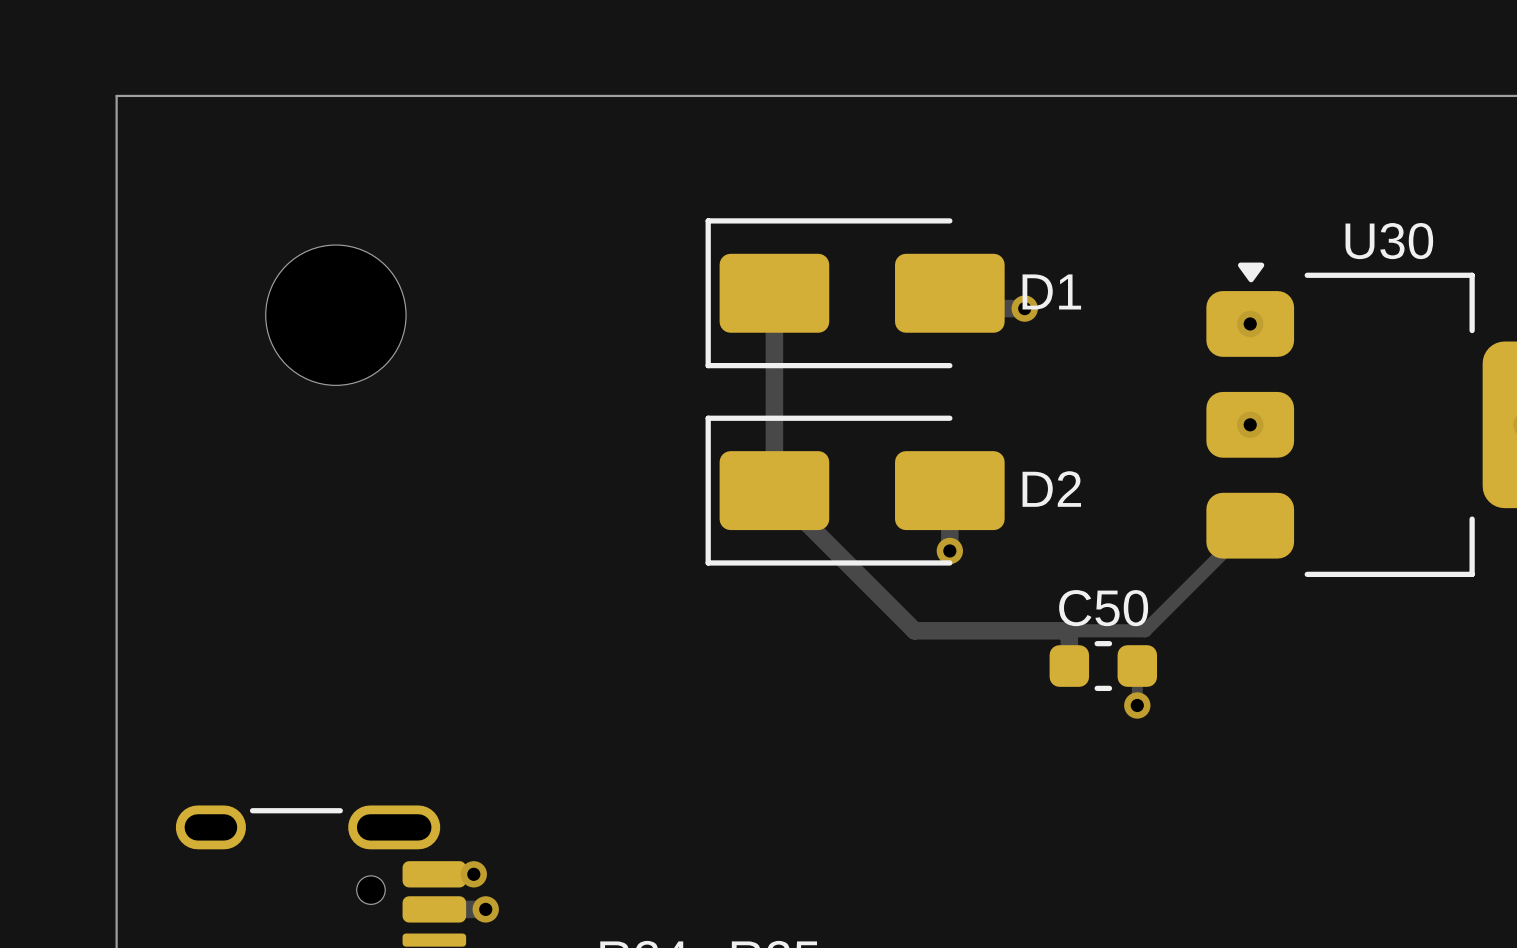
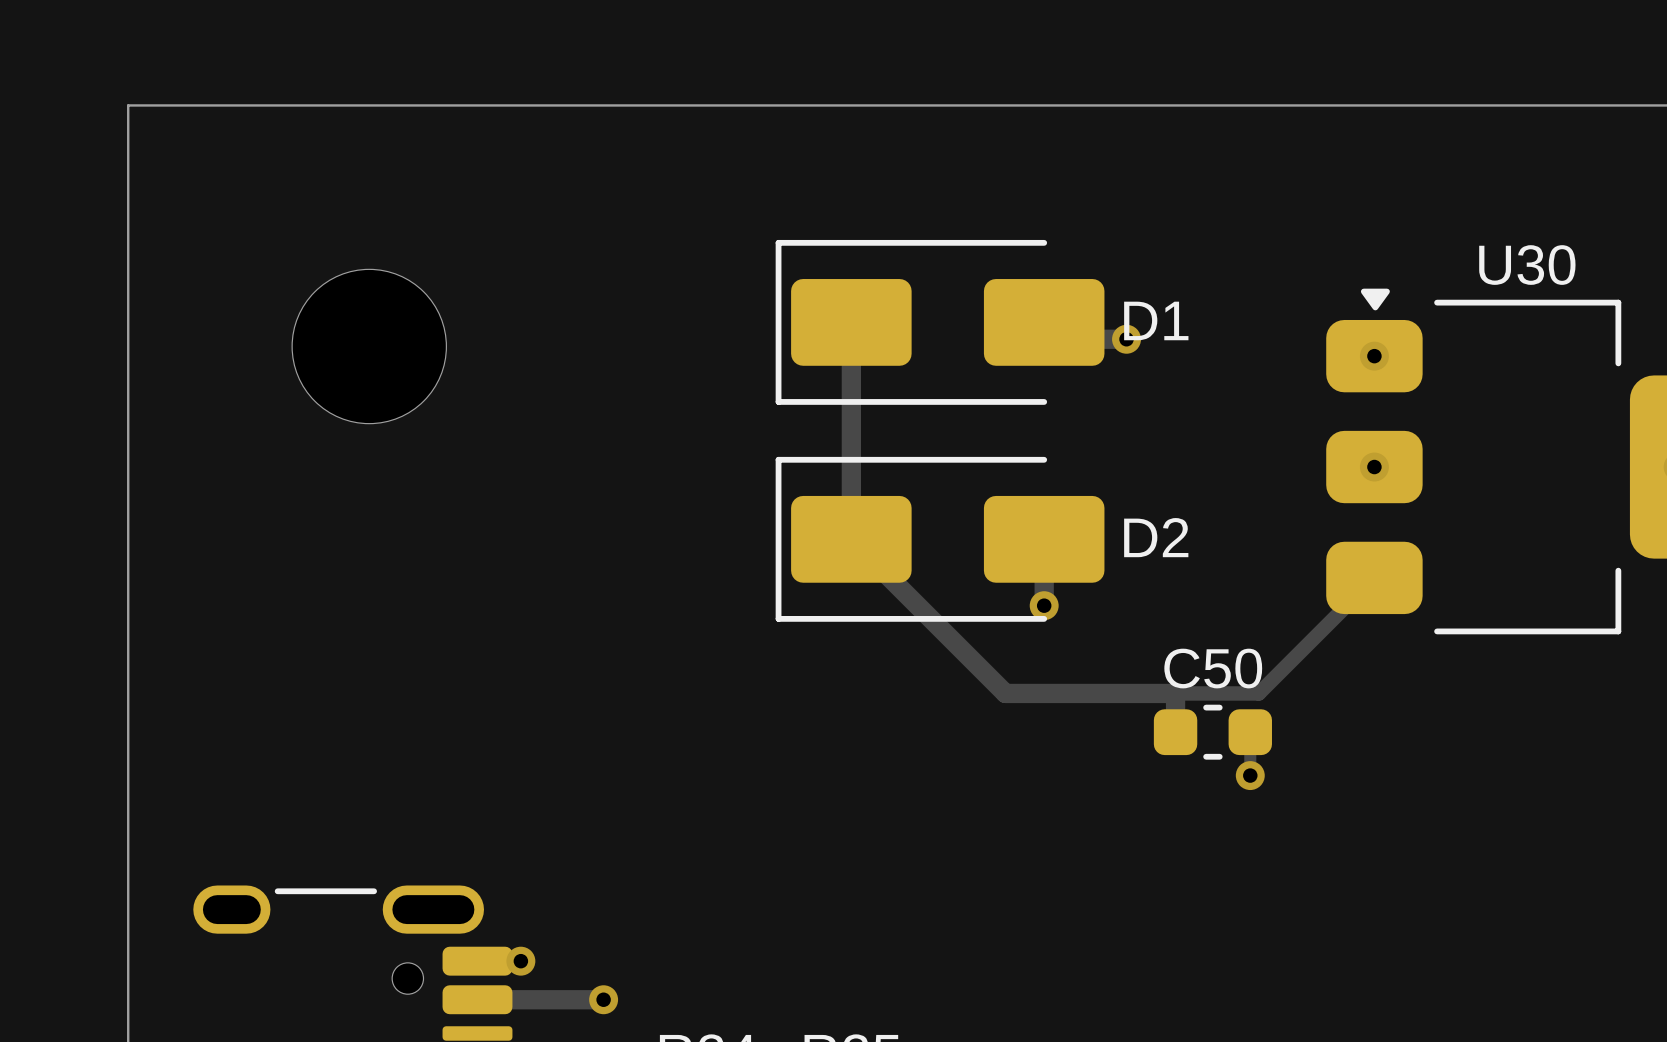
track: none -> (533, 999) (603, 999)
via position: (485, 909) -> (603, 999)

